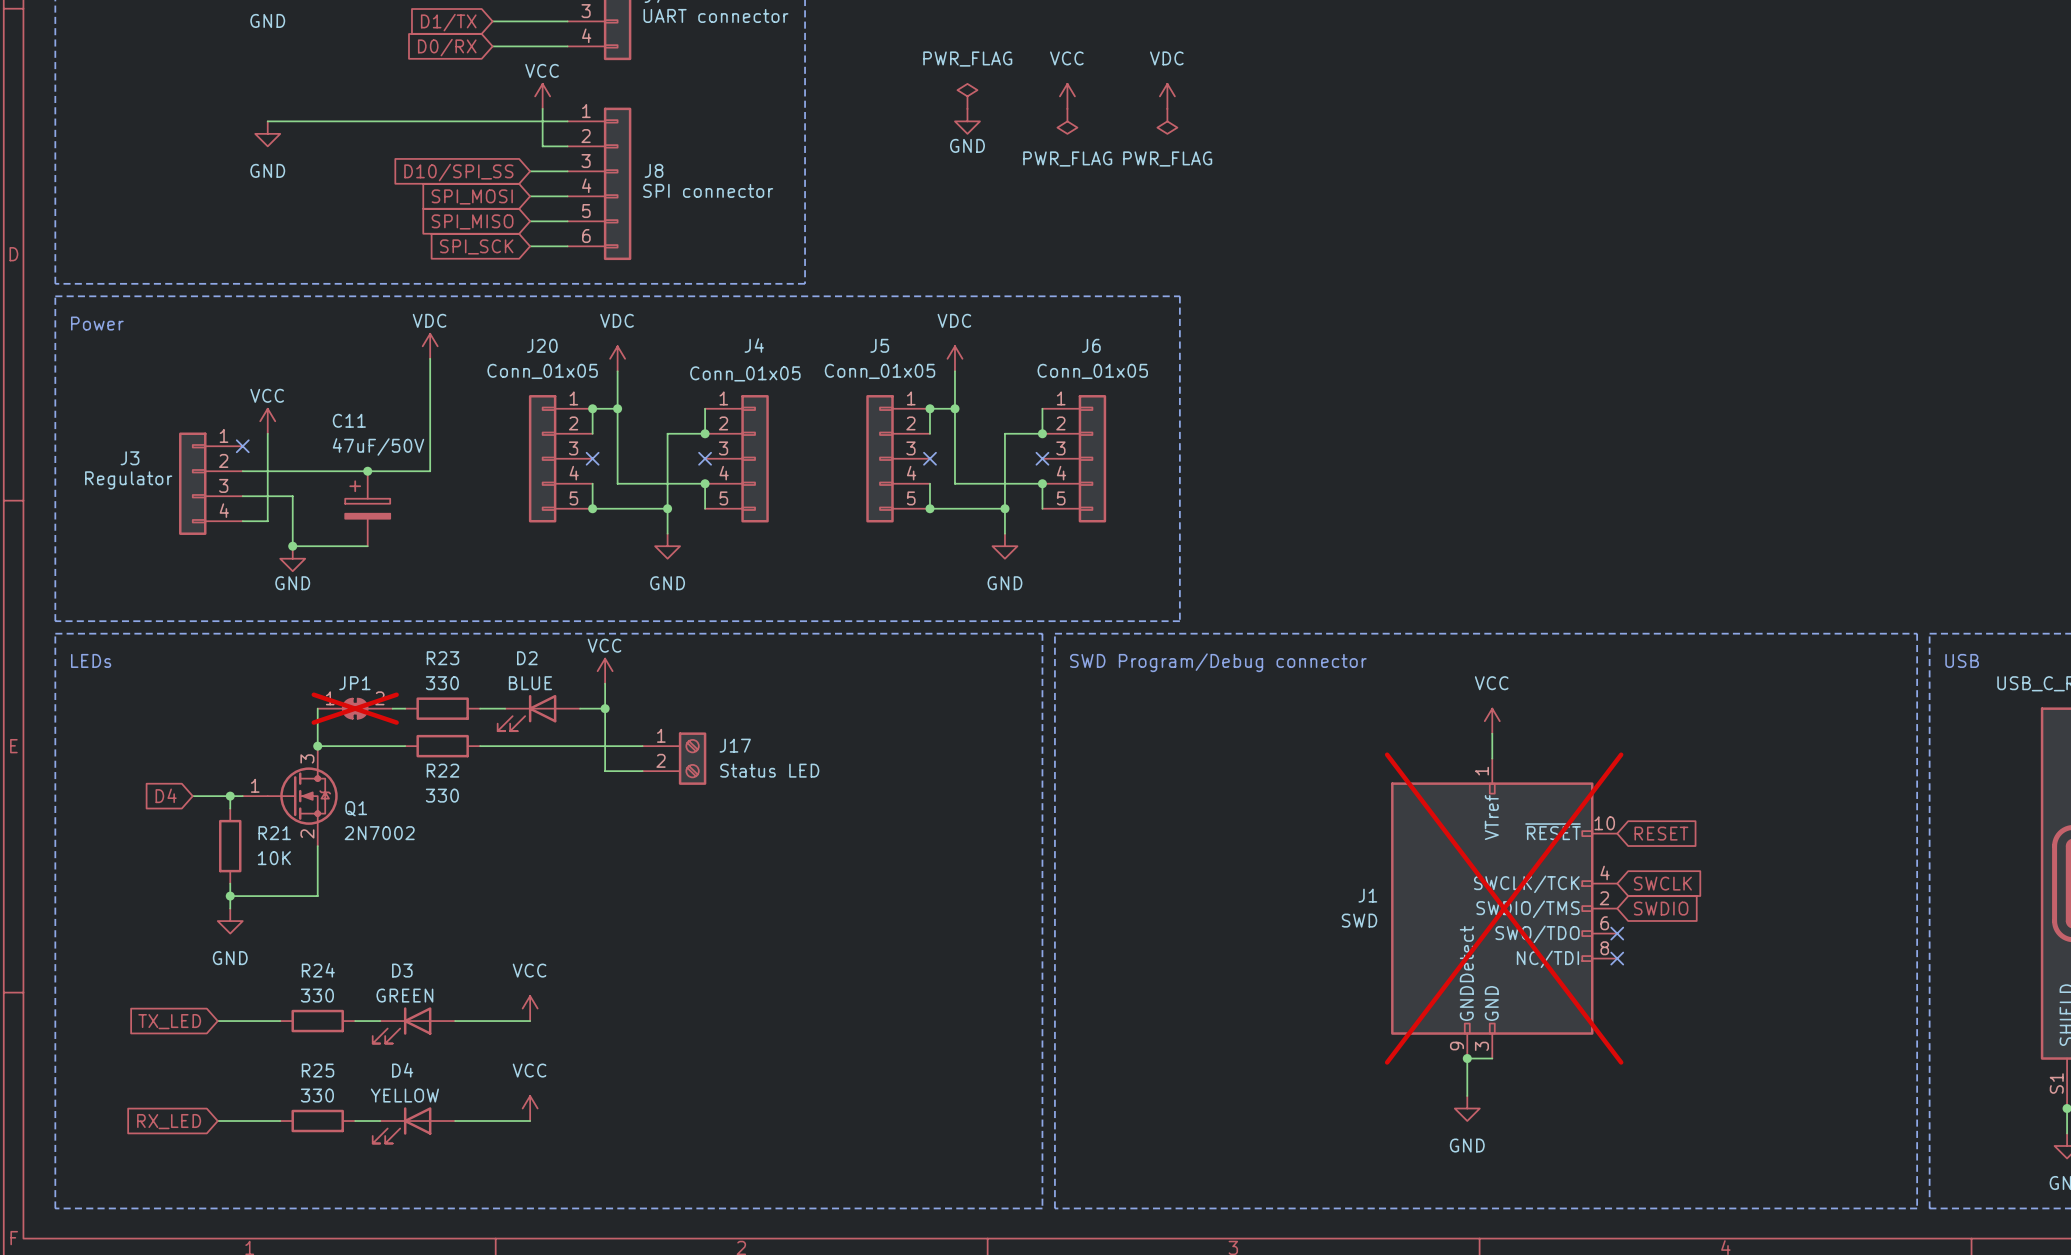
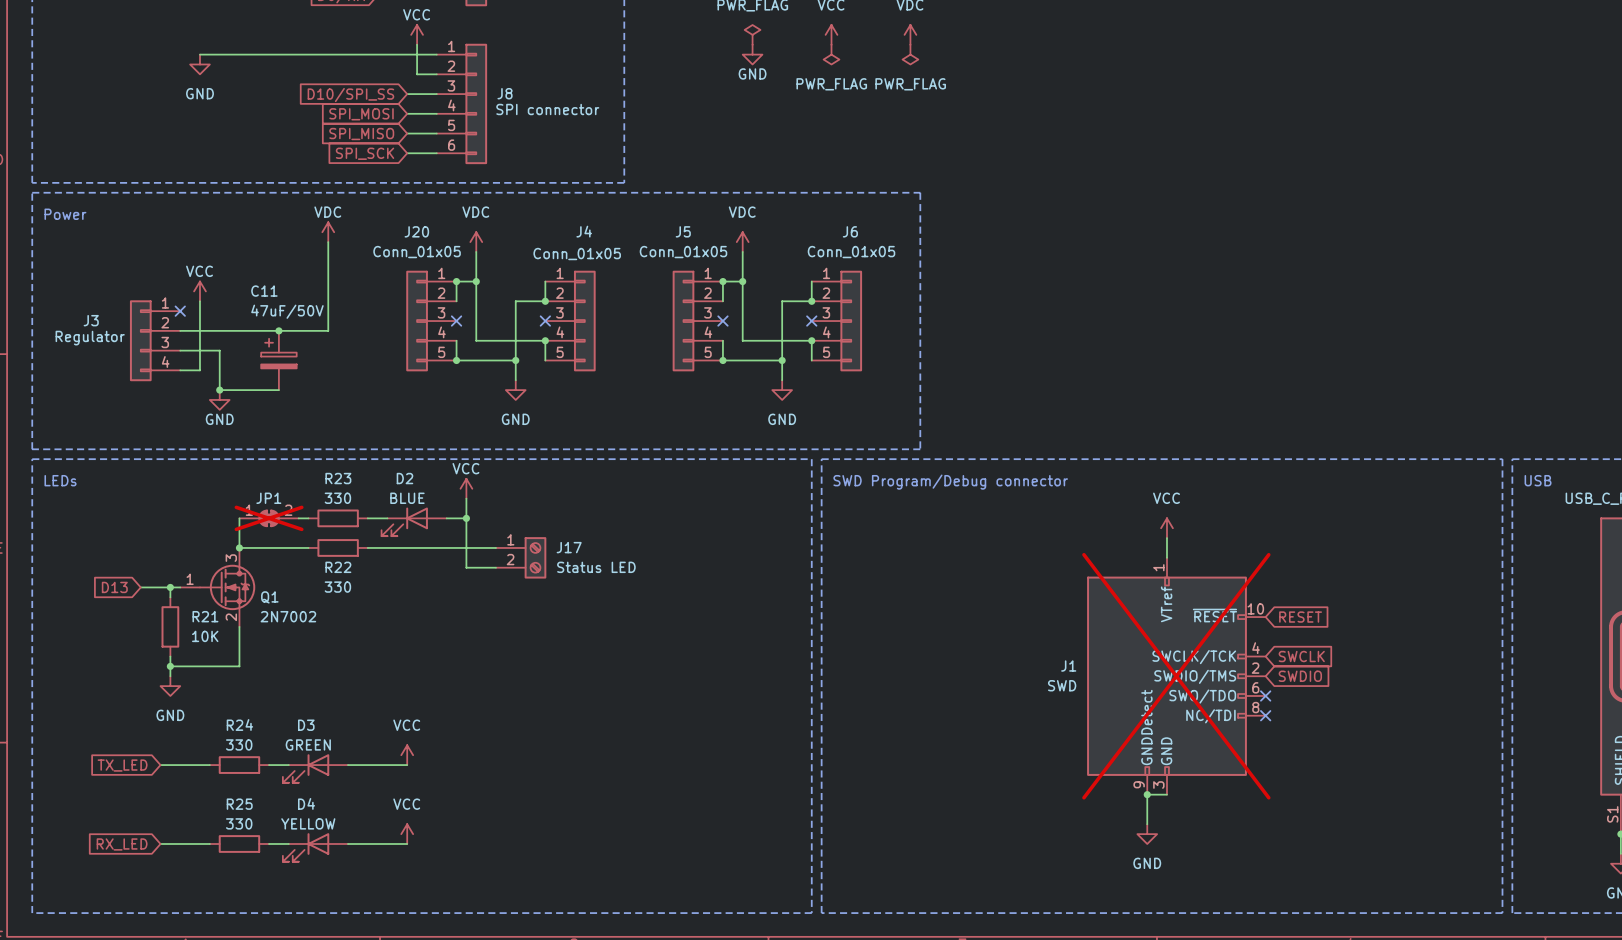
global label: D4 (166, 795) -> D13 (114, 587)

